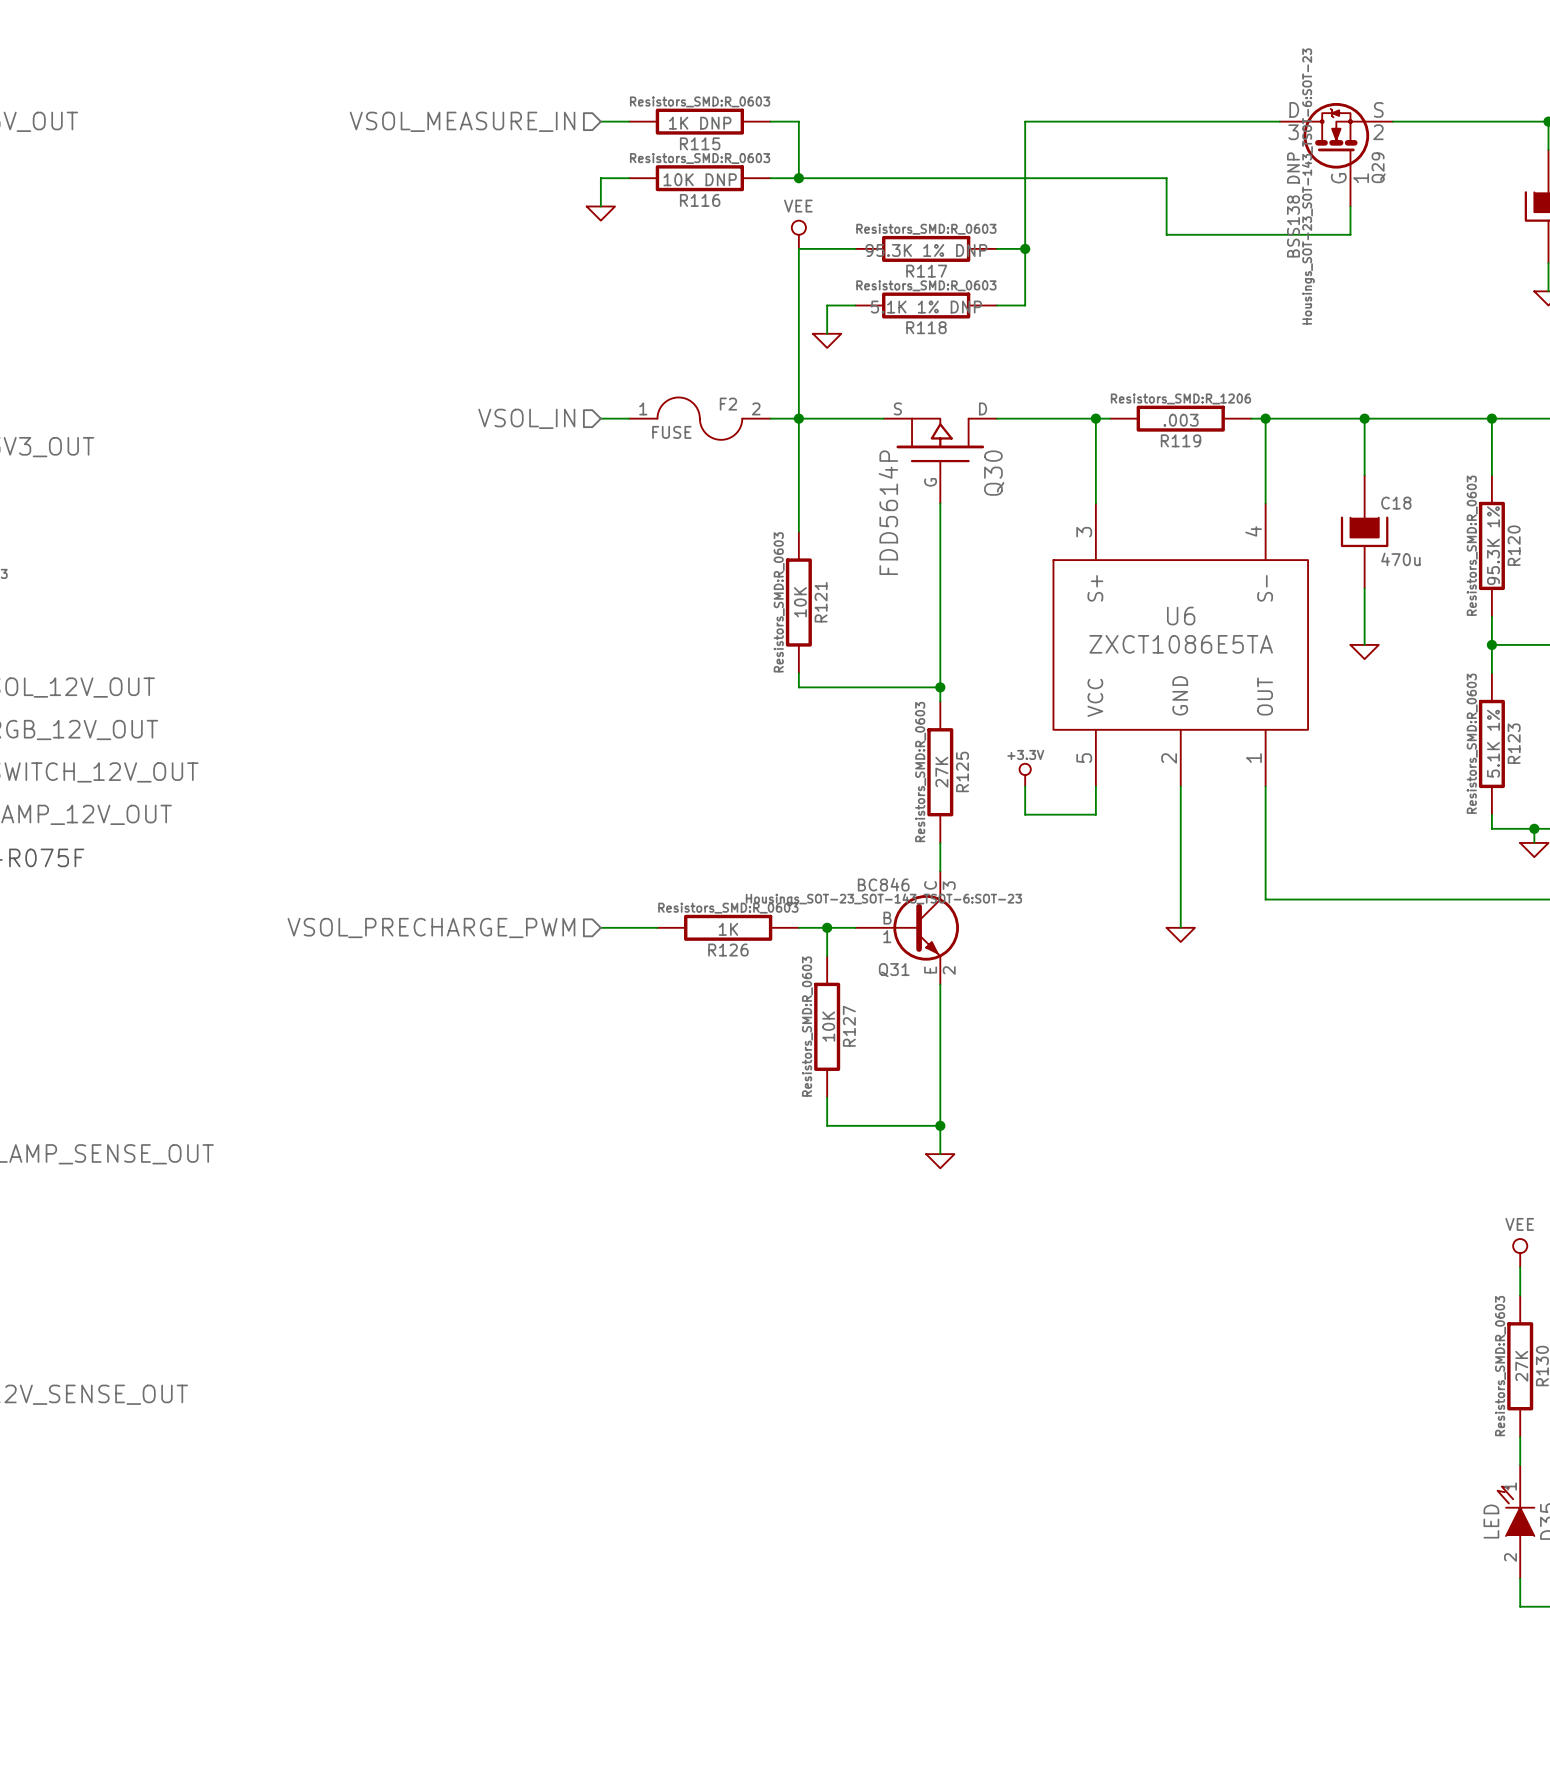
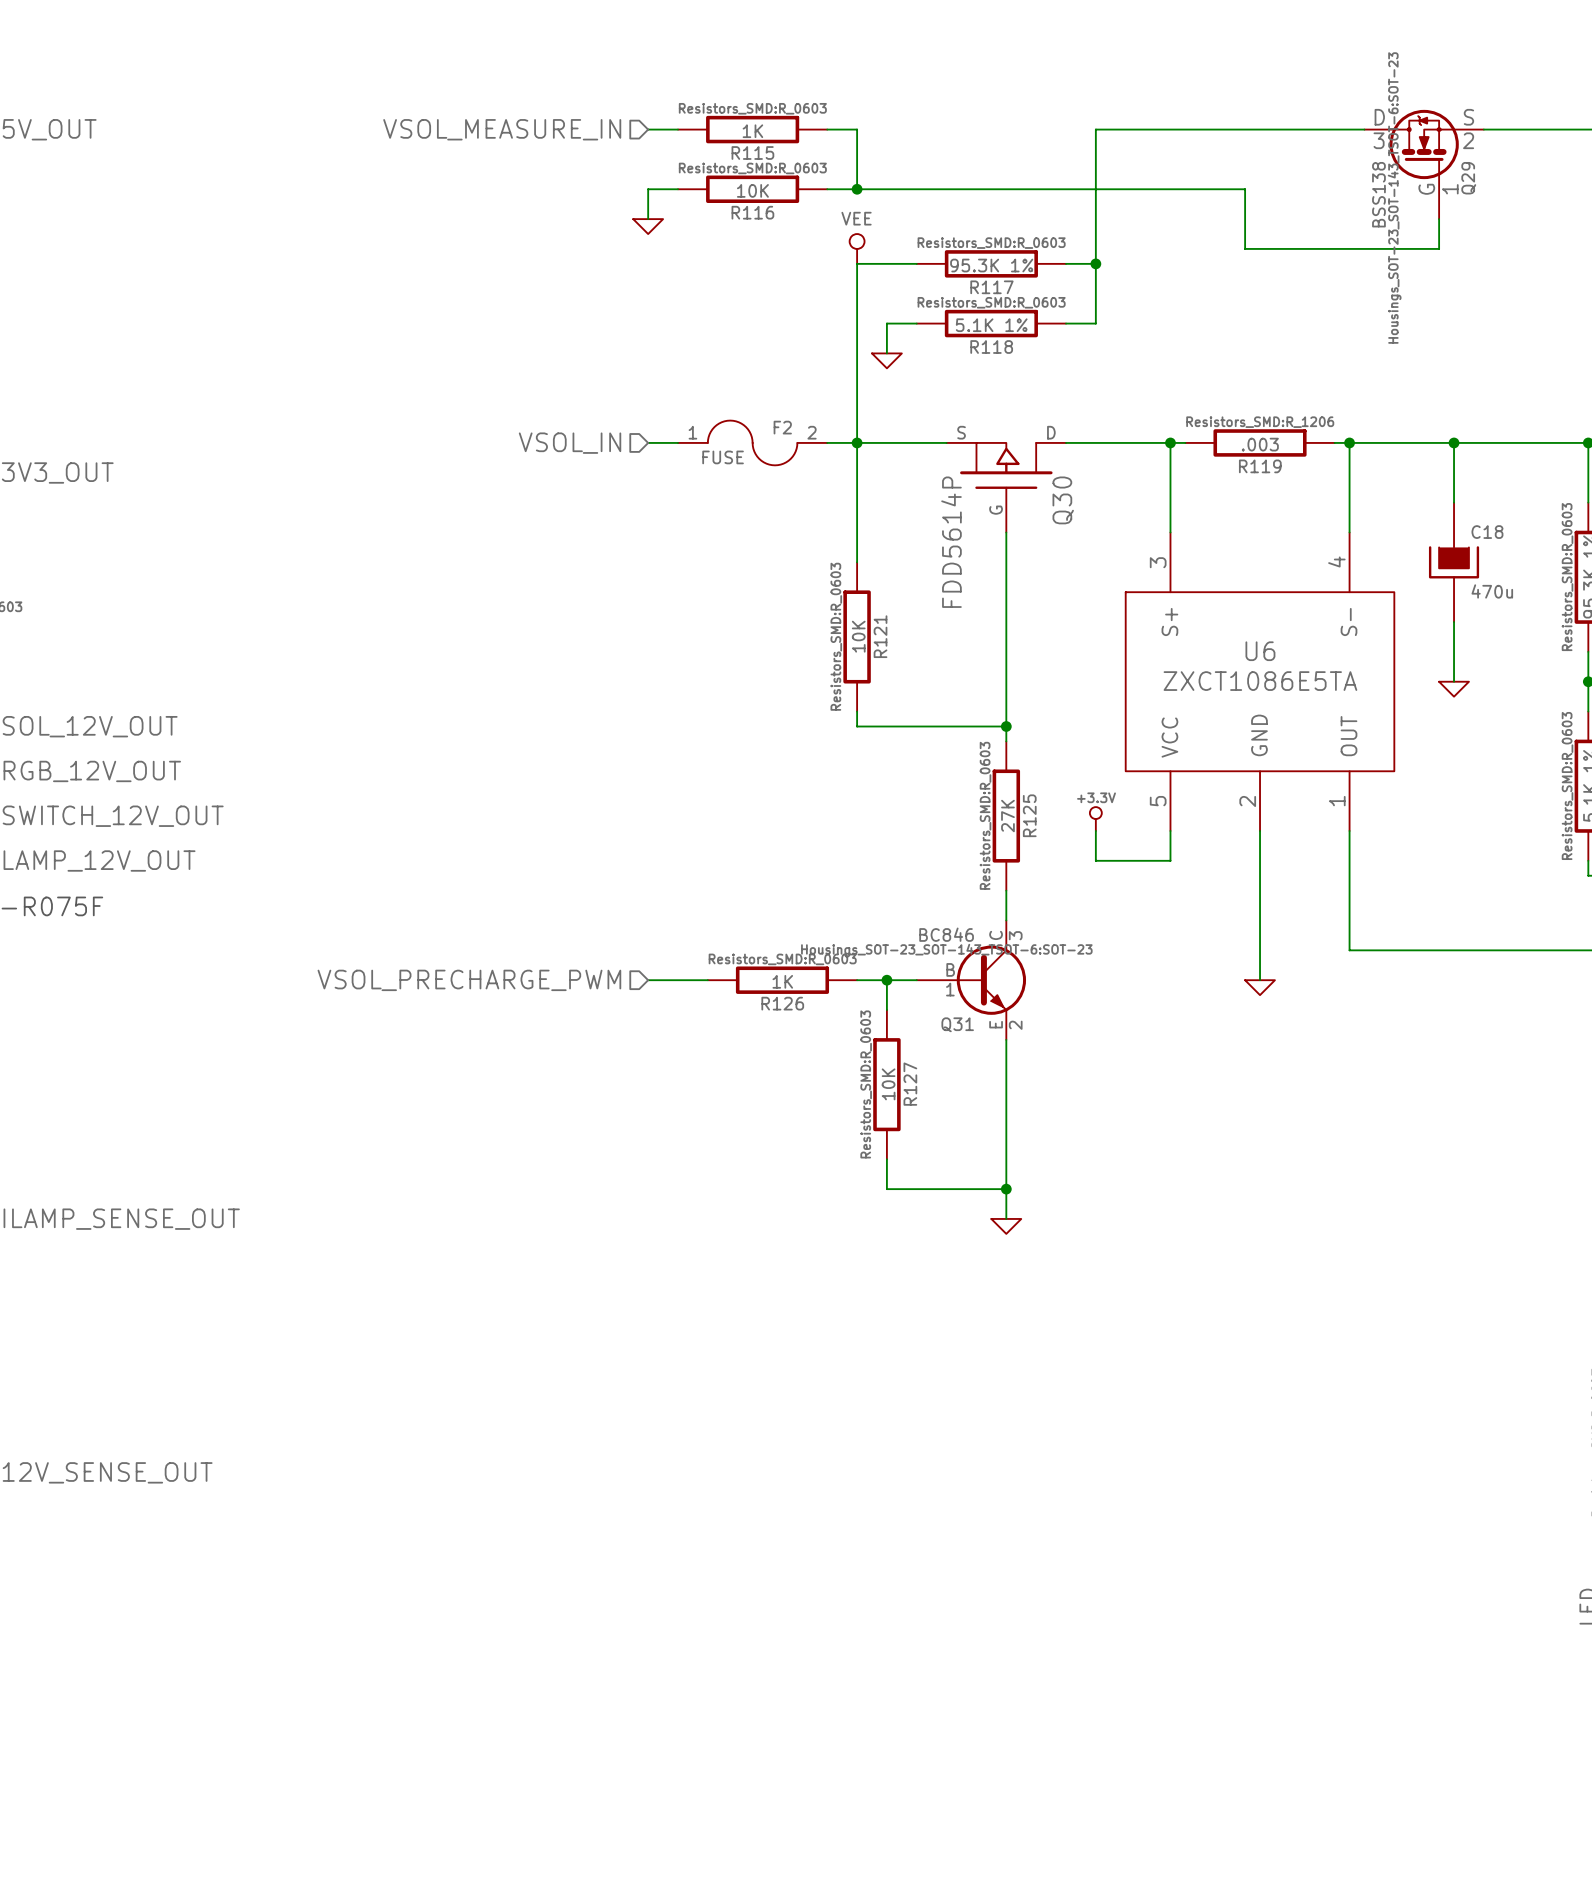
R115 value: 1K DNP (700, 123) -> 1K (752, 131)
R116 value: 10K DNP (700, 179) -> 10K (752, 190)
Q29 value: BSS138 DNP (1293, 204) -> BSS138 (1378, 194)
R117 value: 95.3K 1% DNP (926, 250) -> 95.3K 1% (991, 265)
R118 value: 5.1K 1% DNP (926, 307) -> 5.1K 1% (991, 325)

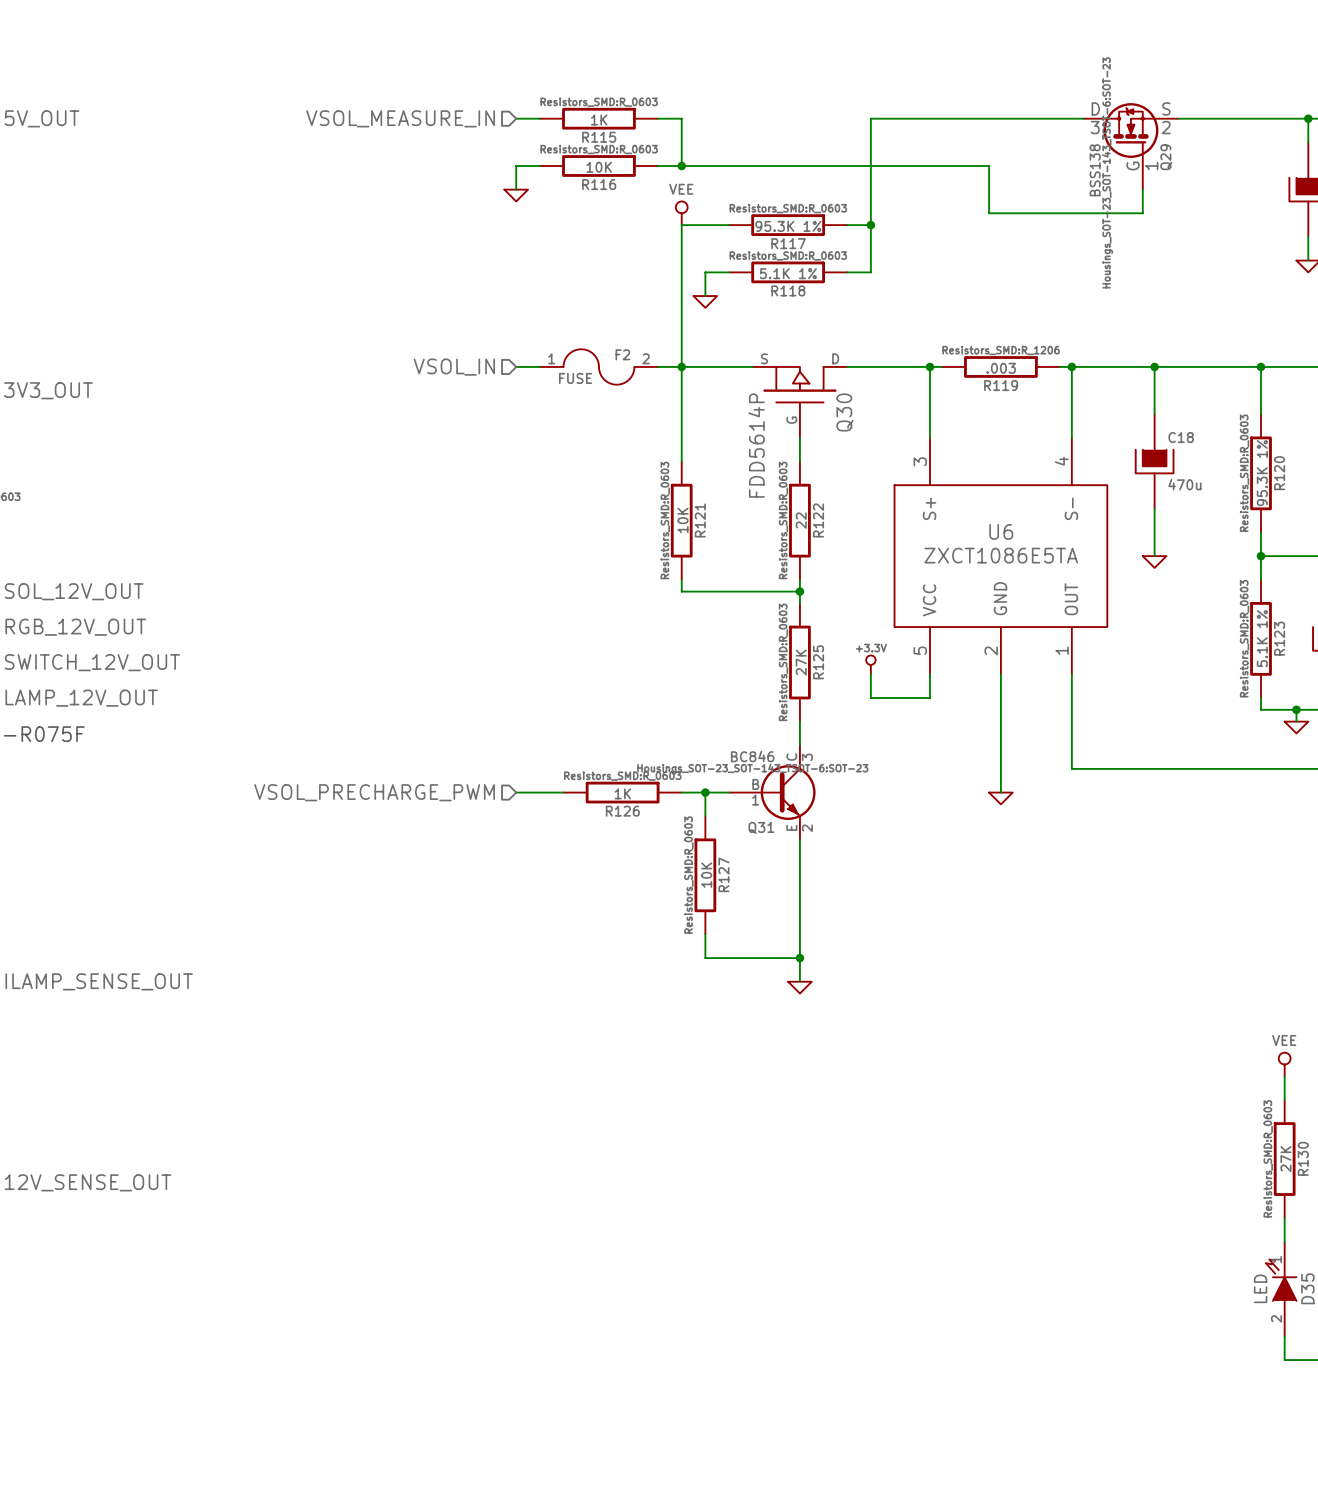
wire: (1006, 562) (1006, 711) -> none
R122: none -> 22 (799, 520)

